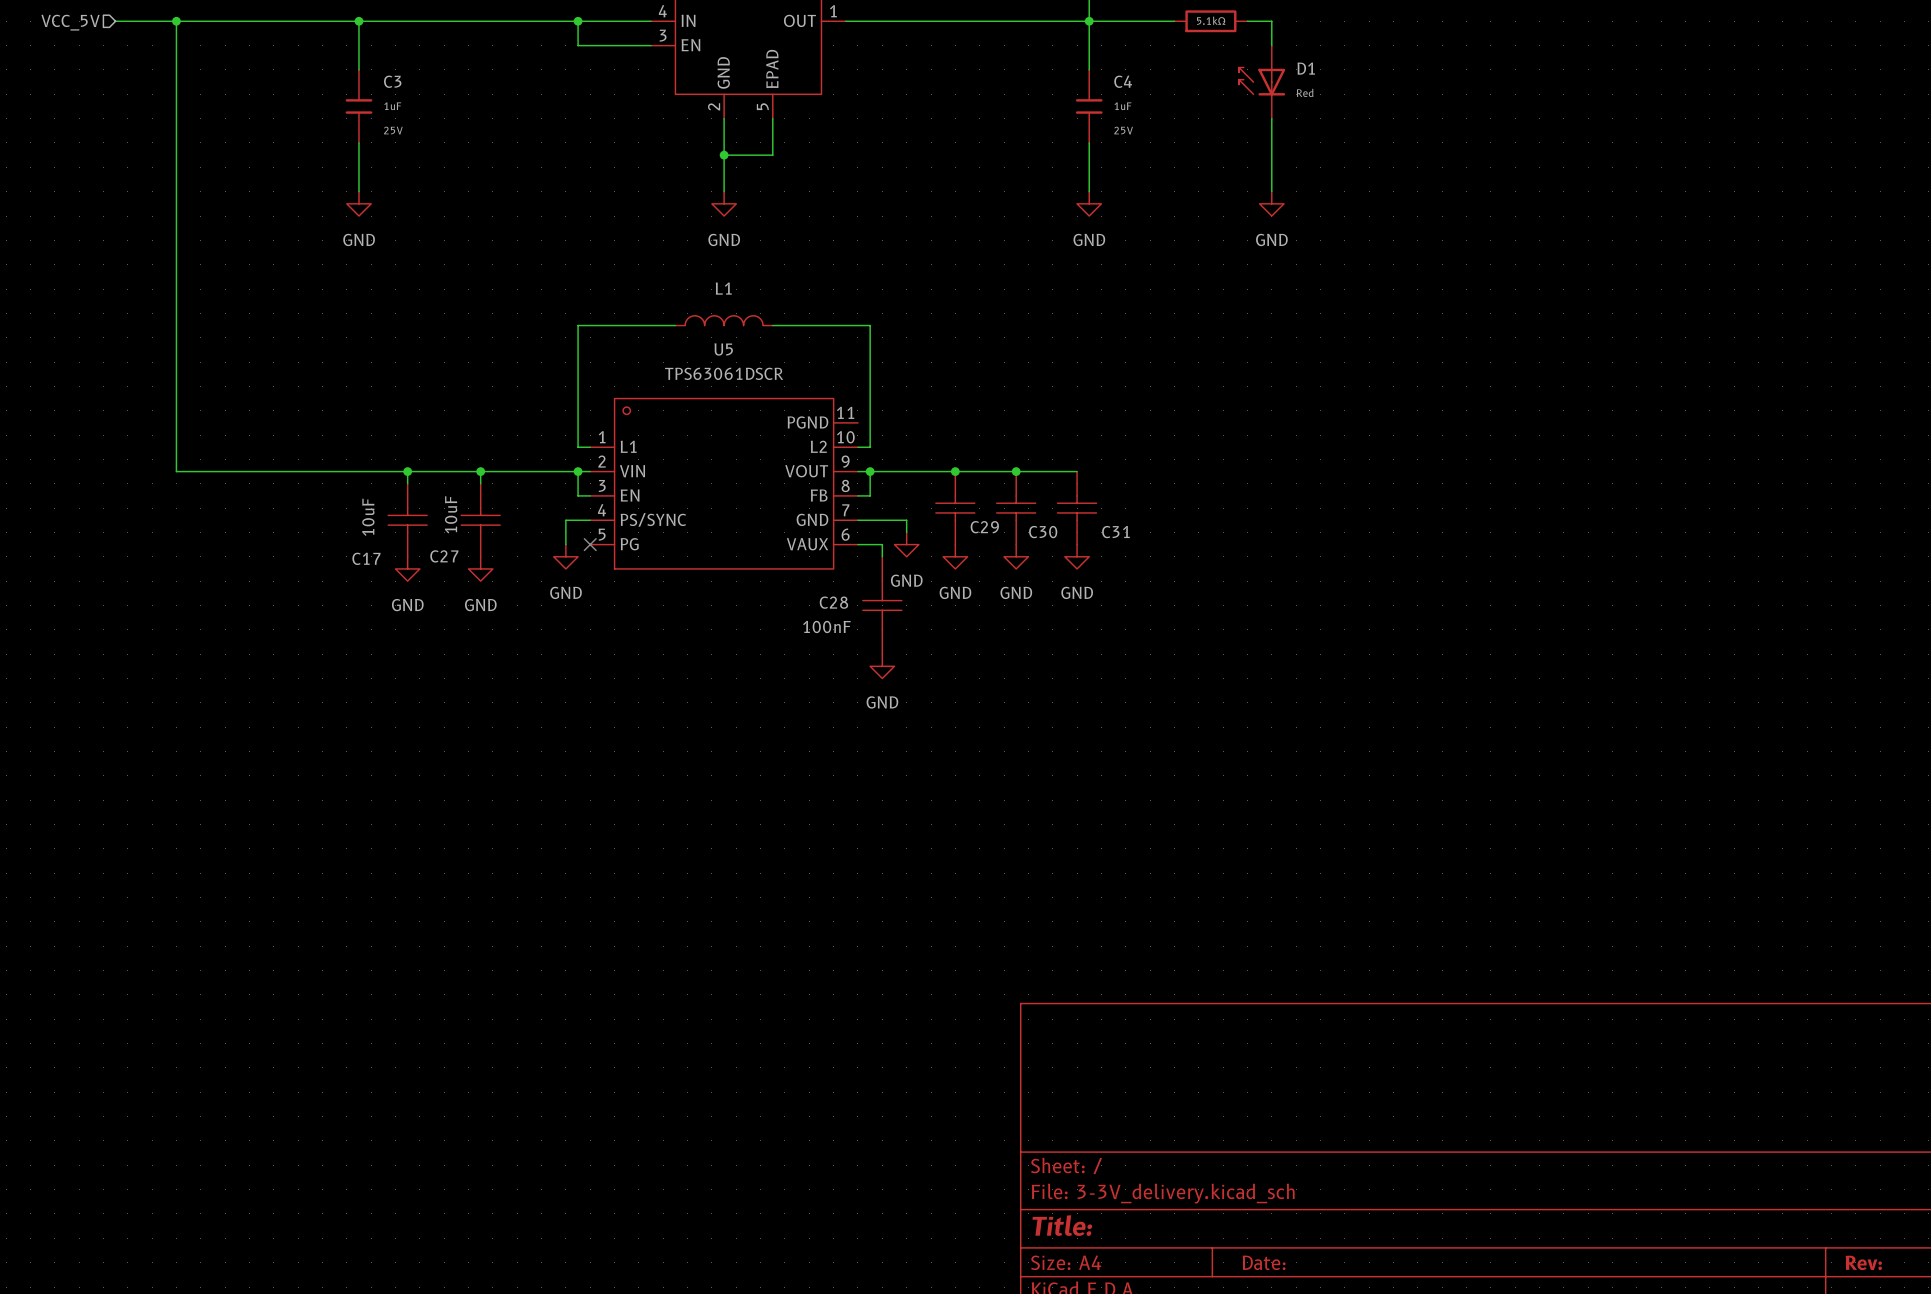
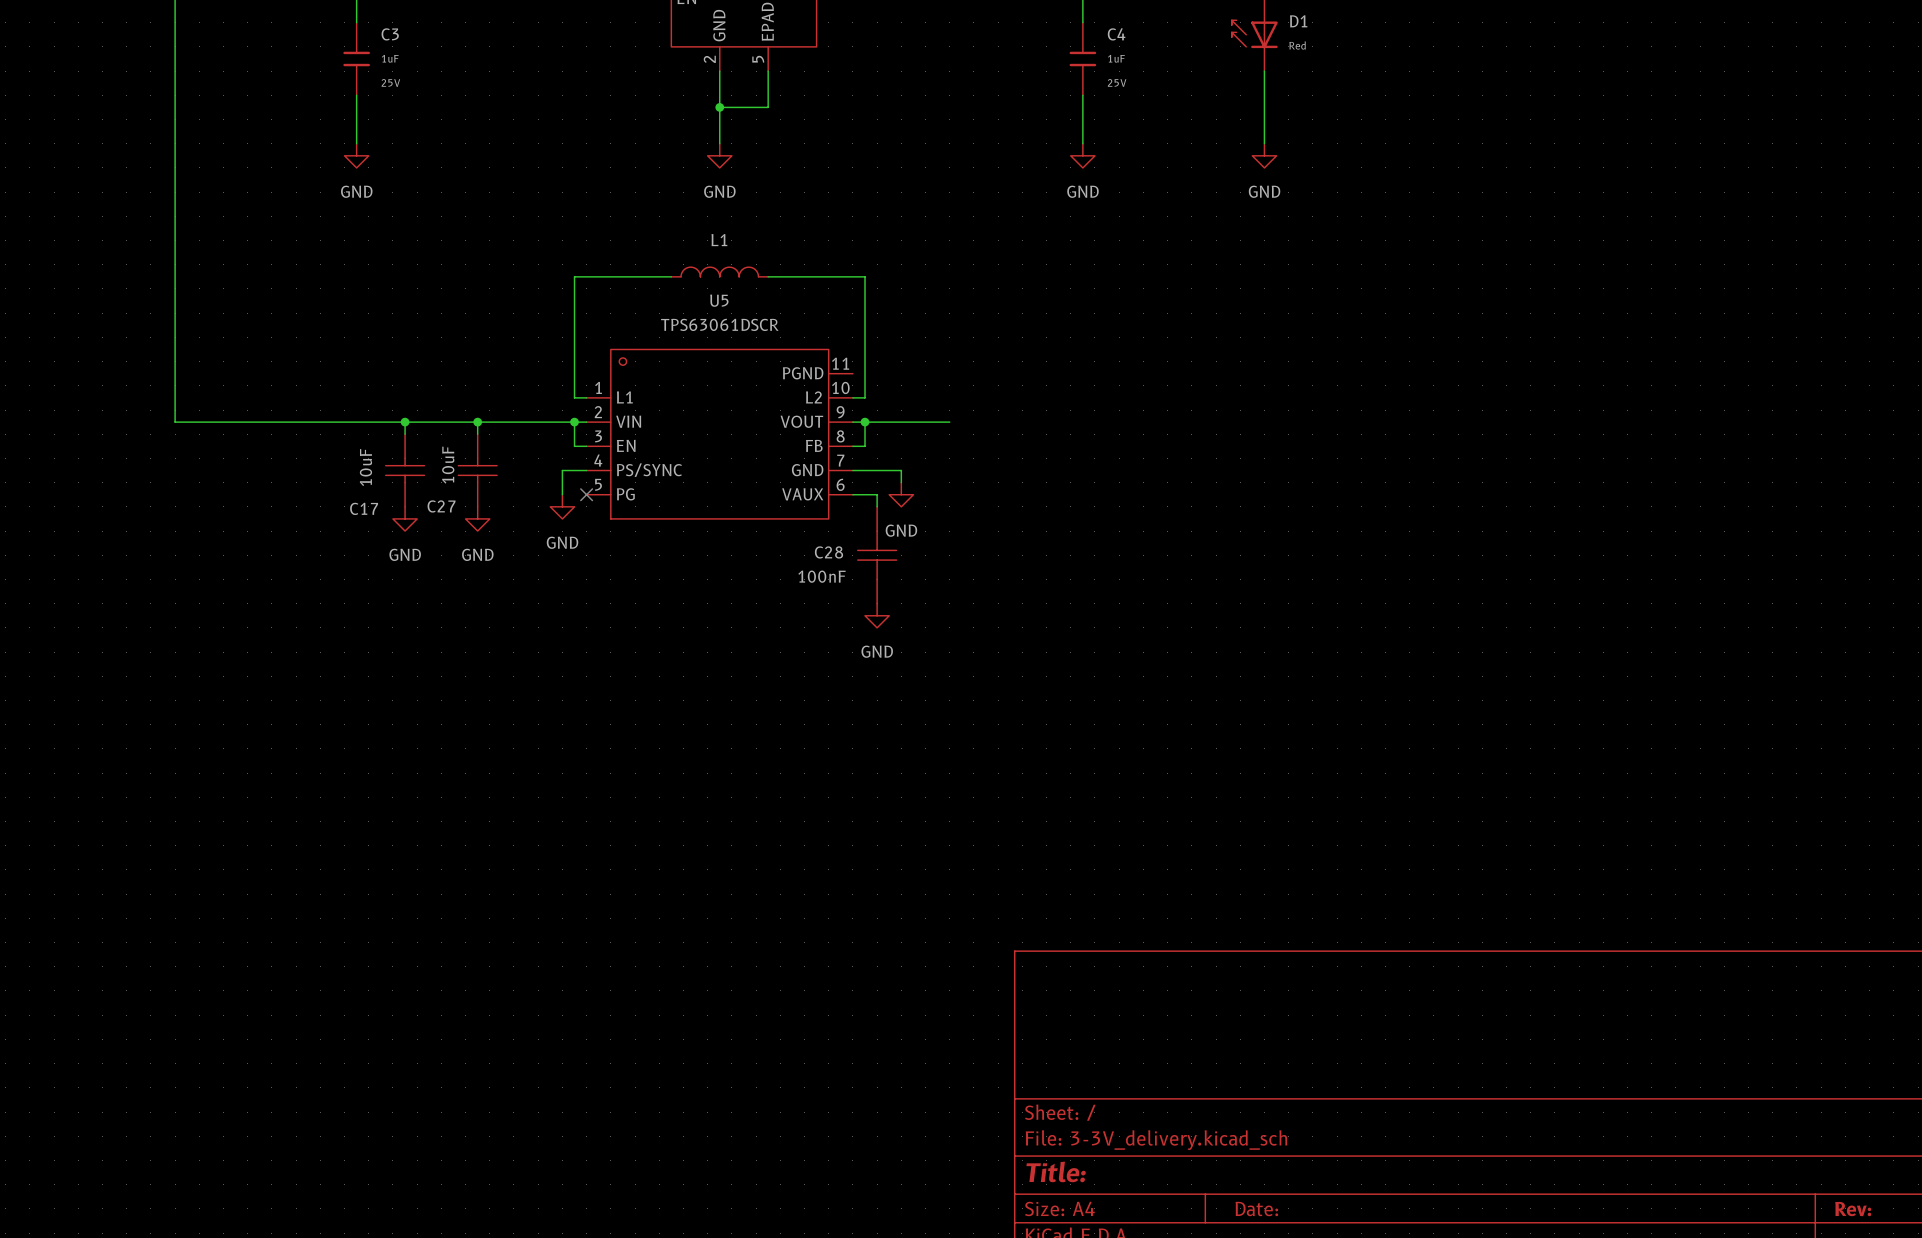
wire: (955, 471) (1077, 471) -> none
junction: (955, 471) -> none
junction: (1016, 471) -> none
C29: (955, 508) -> none
C30: (1016, 508) -> none
C31: (1077, 508) -> none
power symbol: GND (955, 556) -> none
power symbol: GND (1016, 556) -> none
power symbol: GND (1077, 556) -> none

